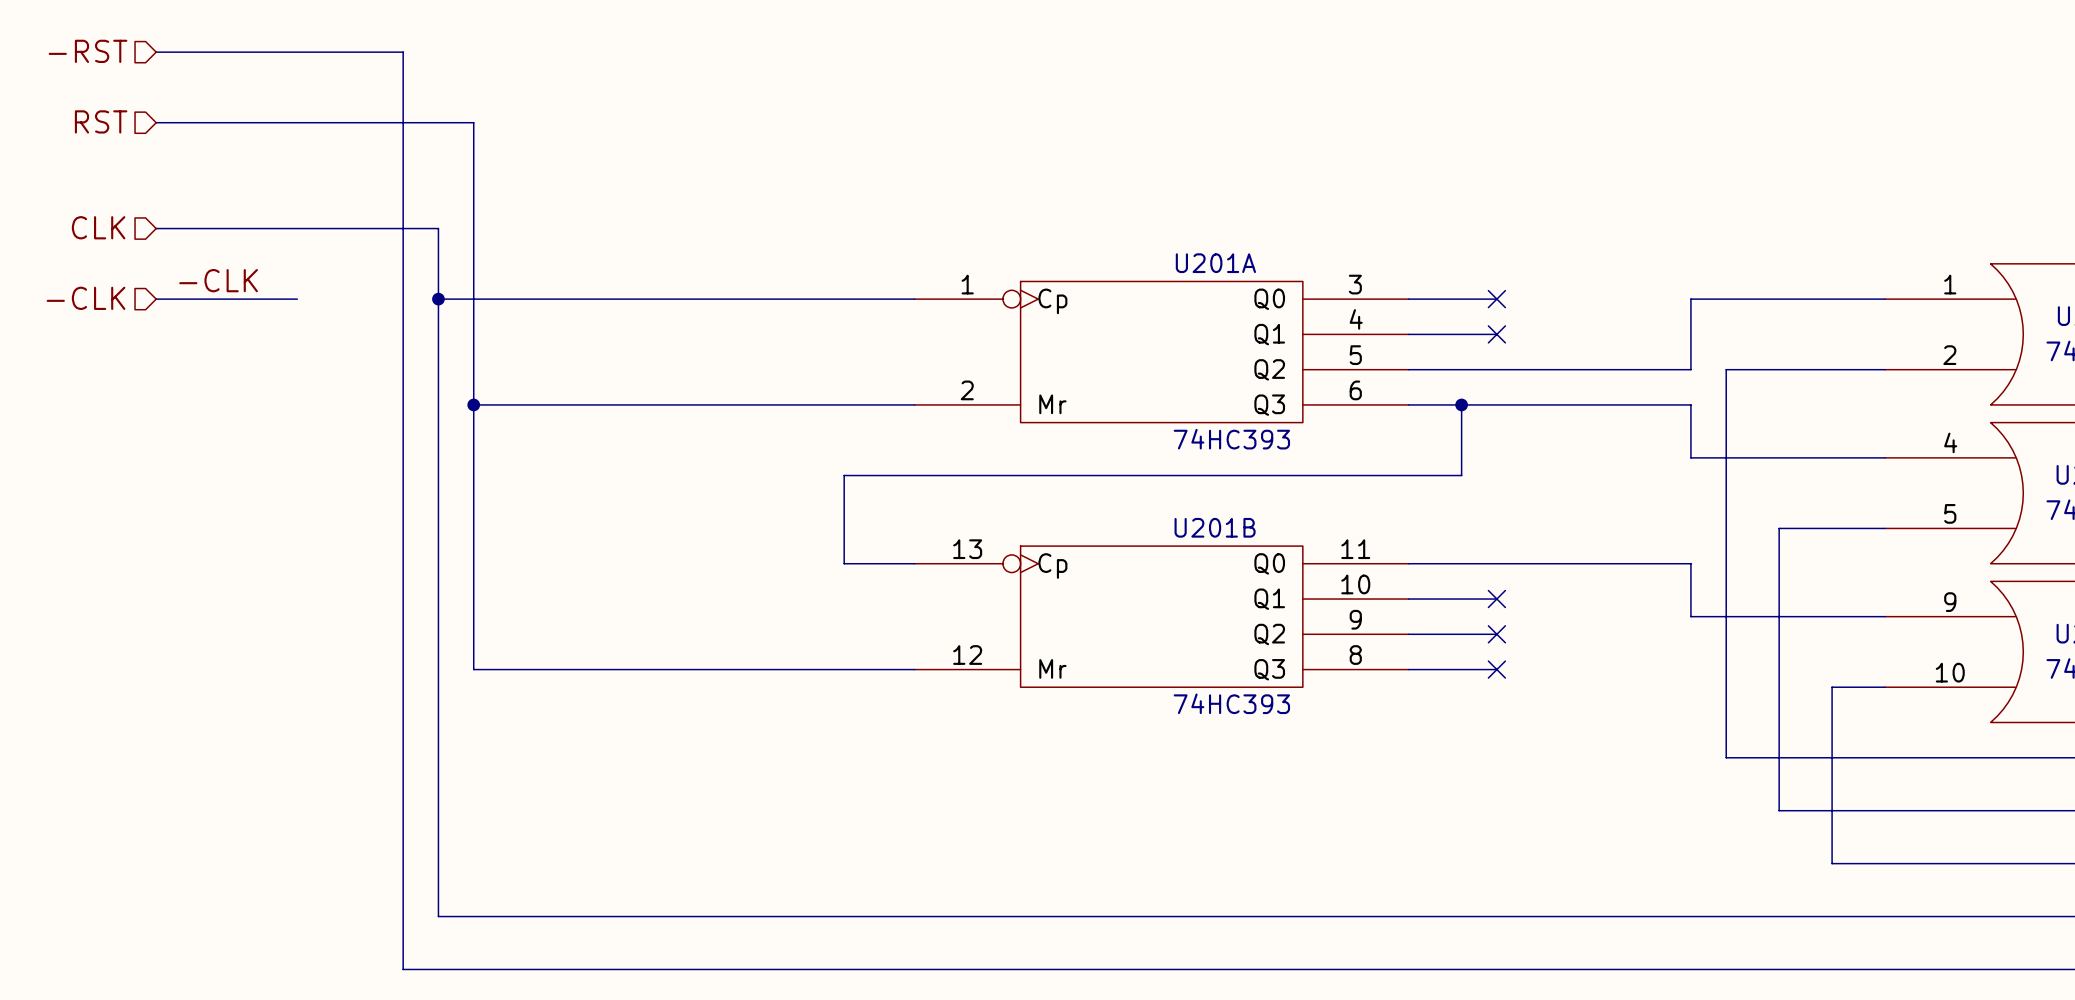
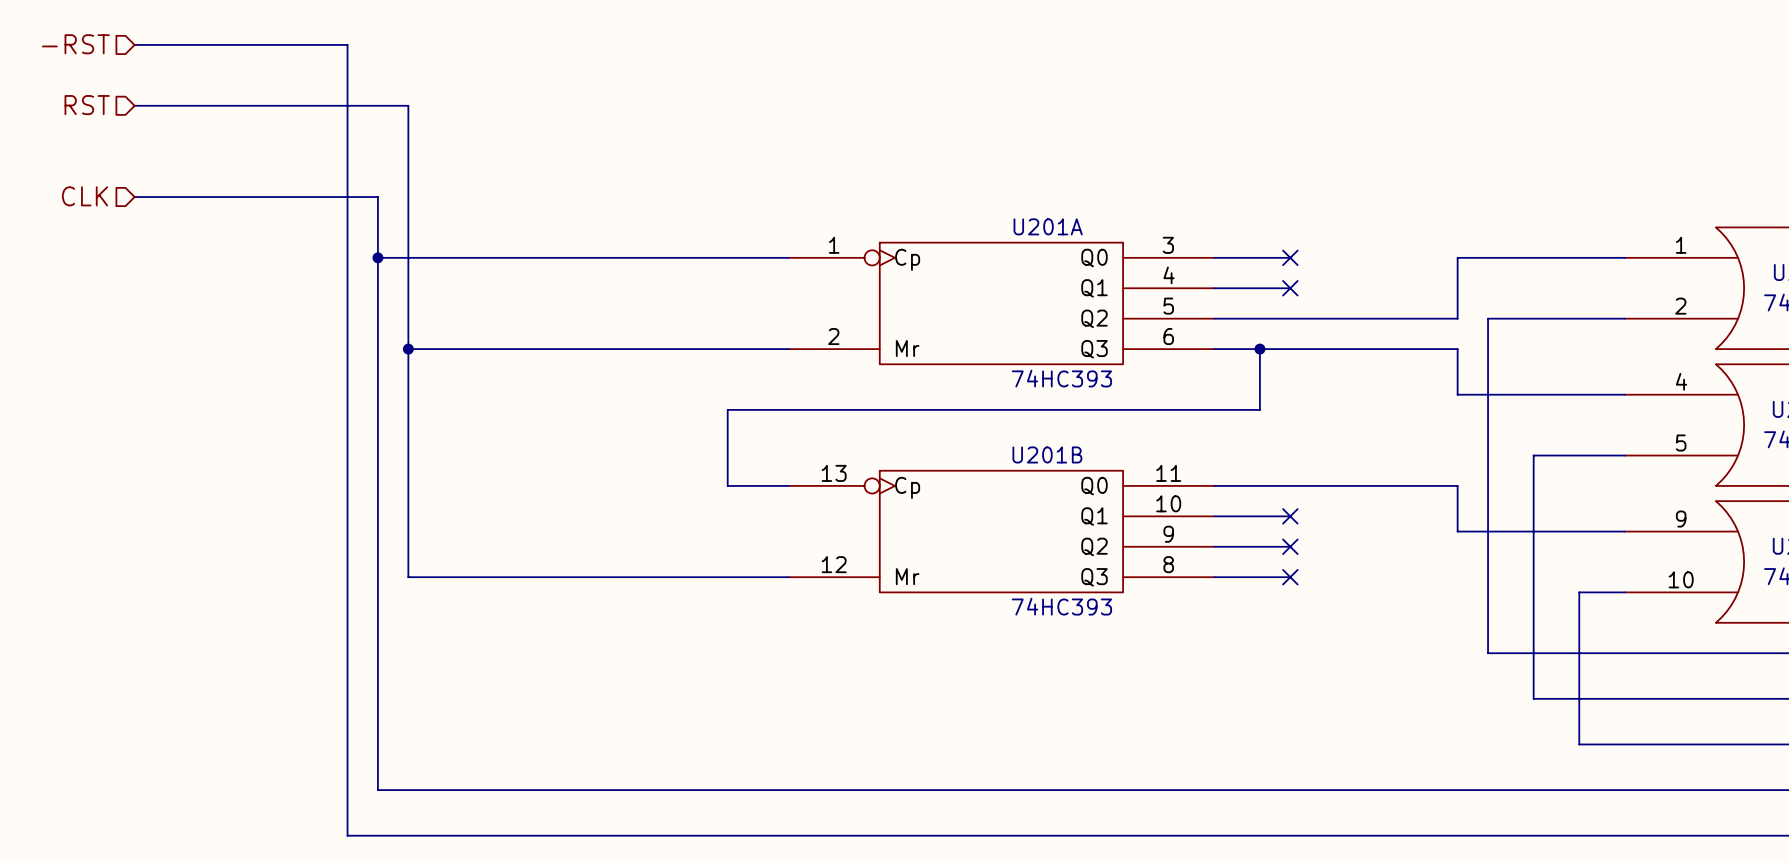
label: -CLK (218, 280) -> none
hierarchical label: -CLK (86, 298) -> none
wire: (156, 299) (297, 299) -> none

